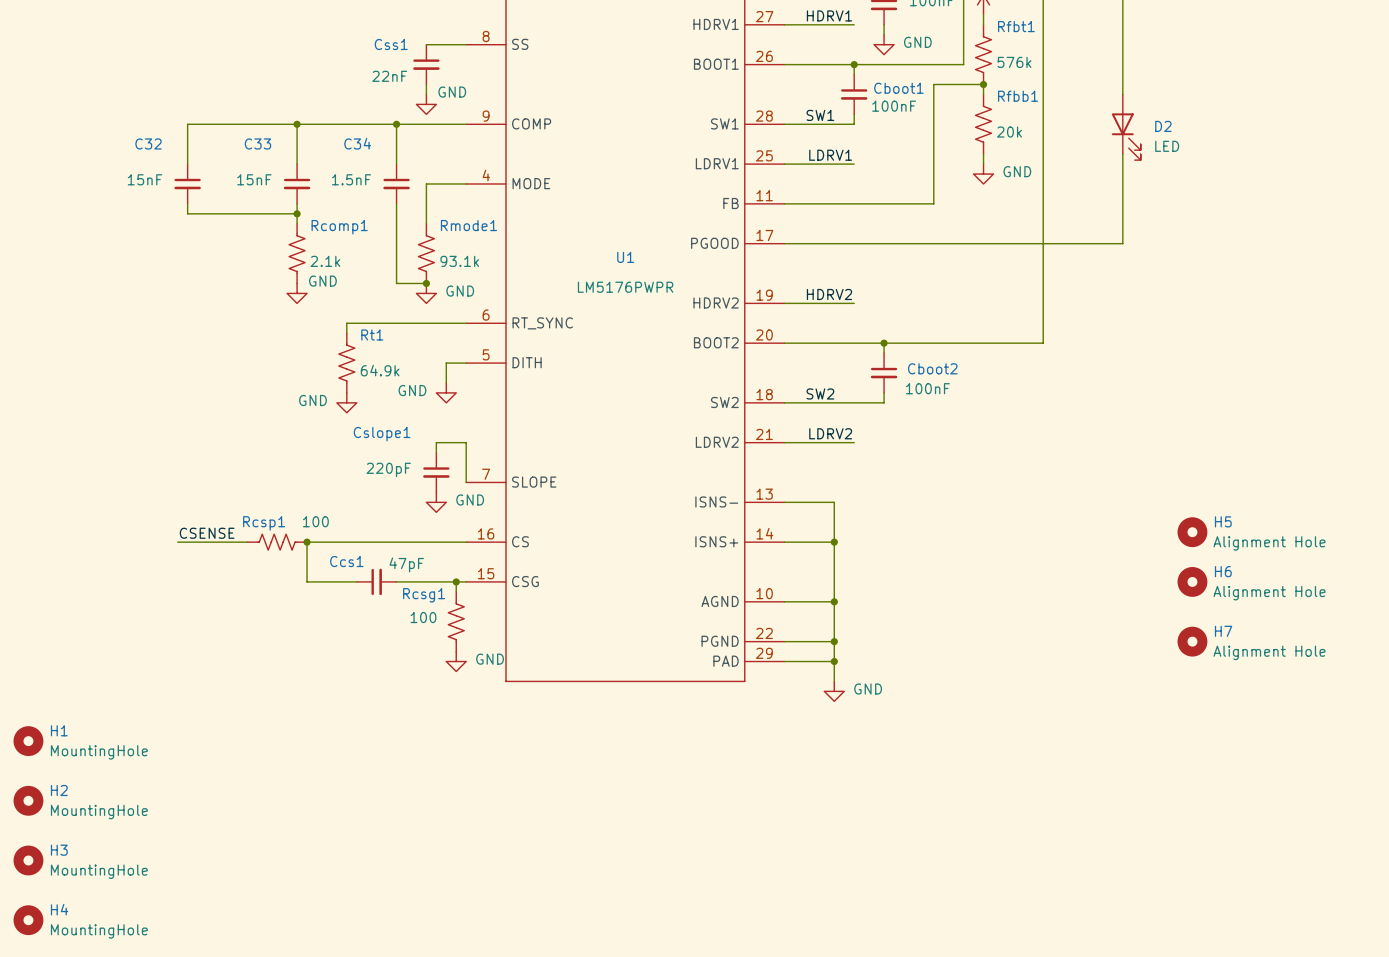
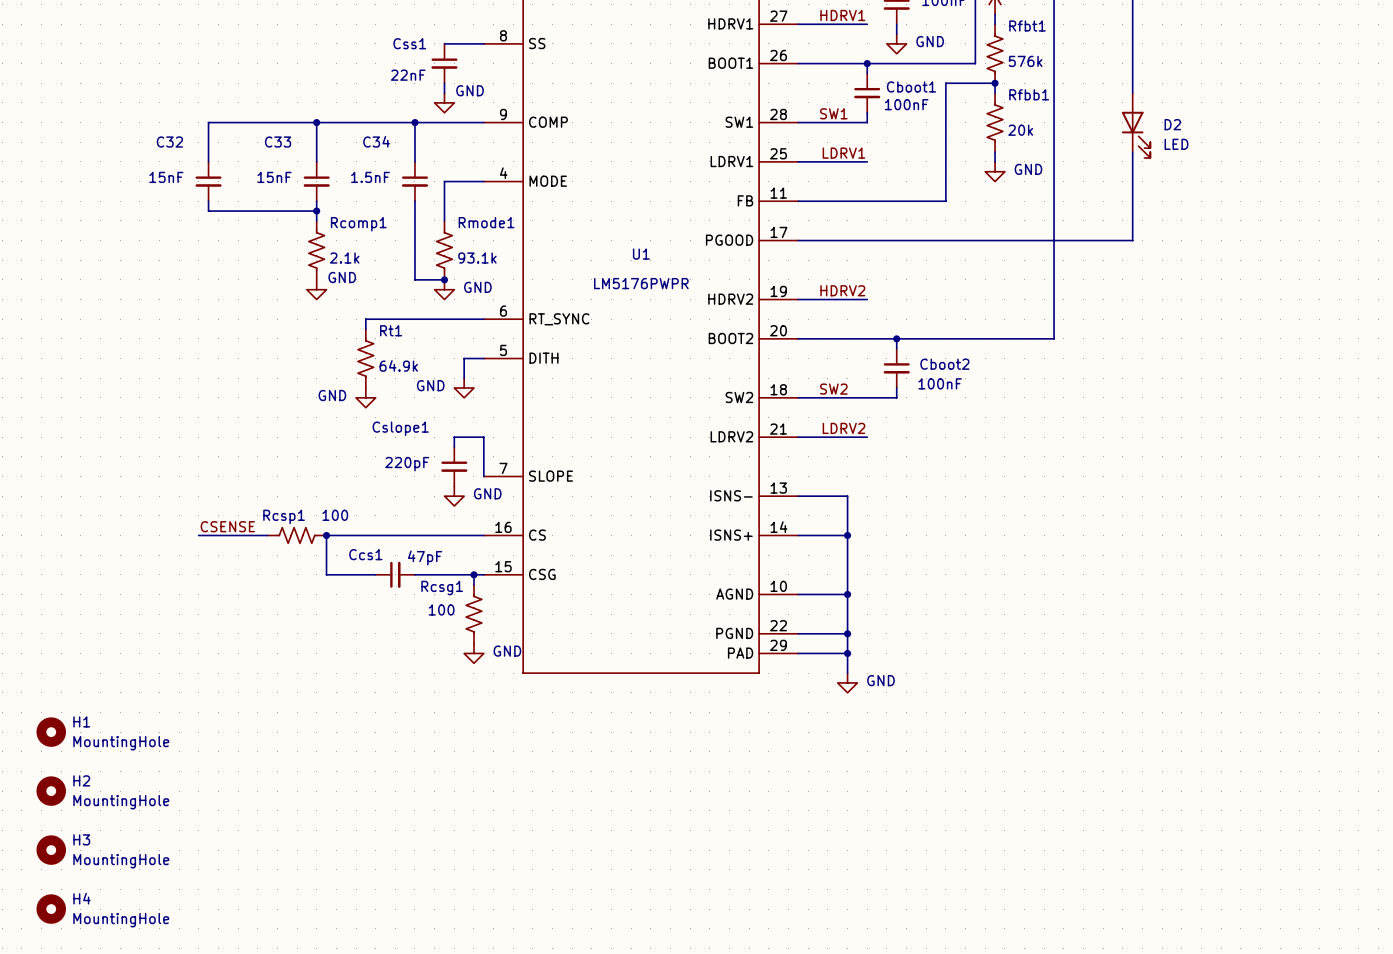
H5: Alignment Hole (1192, 532) -> none
H6: Alignment Hole (1192, 581) -> none
H7: Alignment Hole (1192, 641) -> none

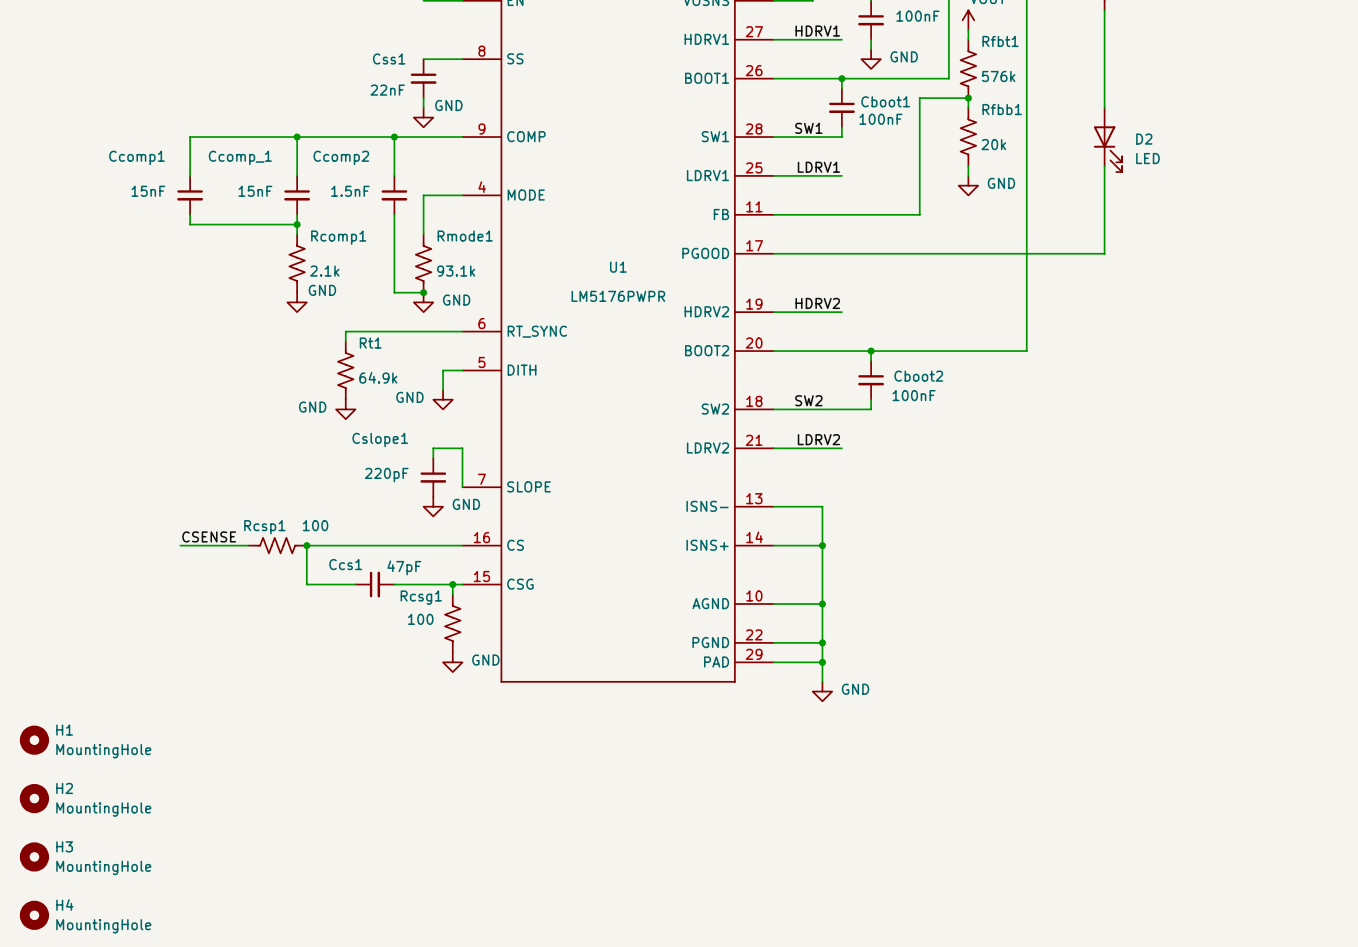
C34 name: C34 (376, 141) -> Ccomp2 (341, 157)
C32 name: C32 (169, 142) -> Ccomp1 (137, 157)
C33 name: C33 (278, 142) -> Ccomp_1 (240, 157)

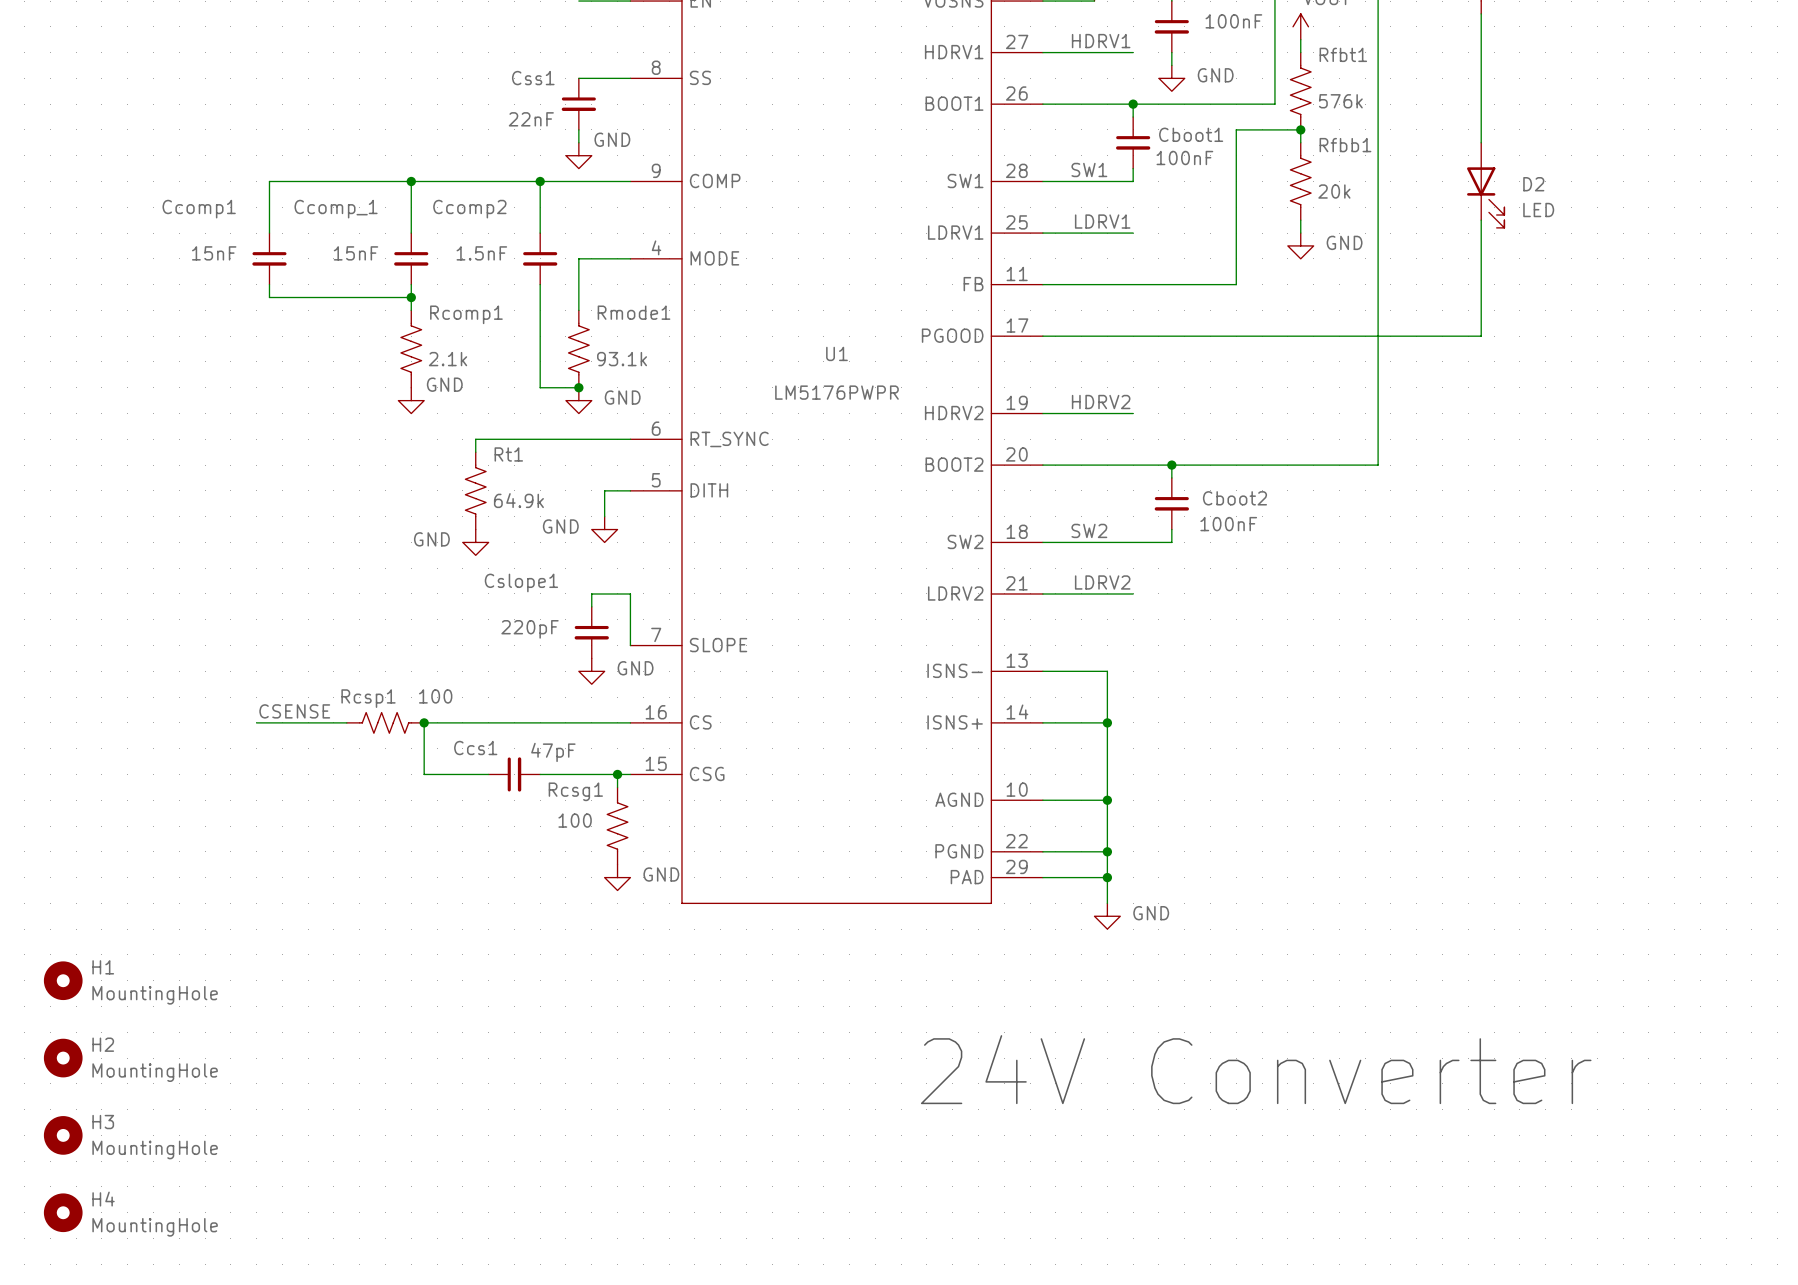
text: none -> 24V Converter (1256, 1069)

